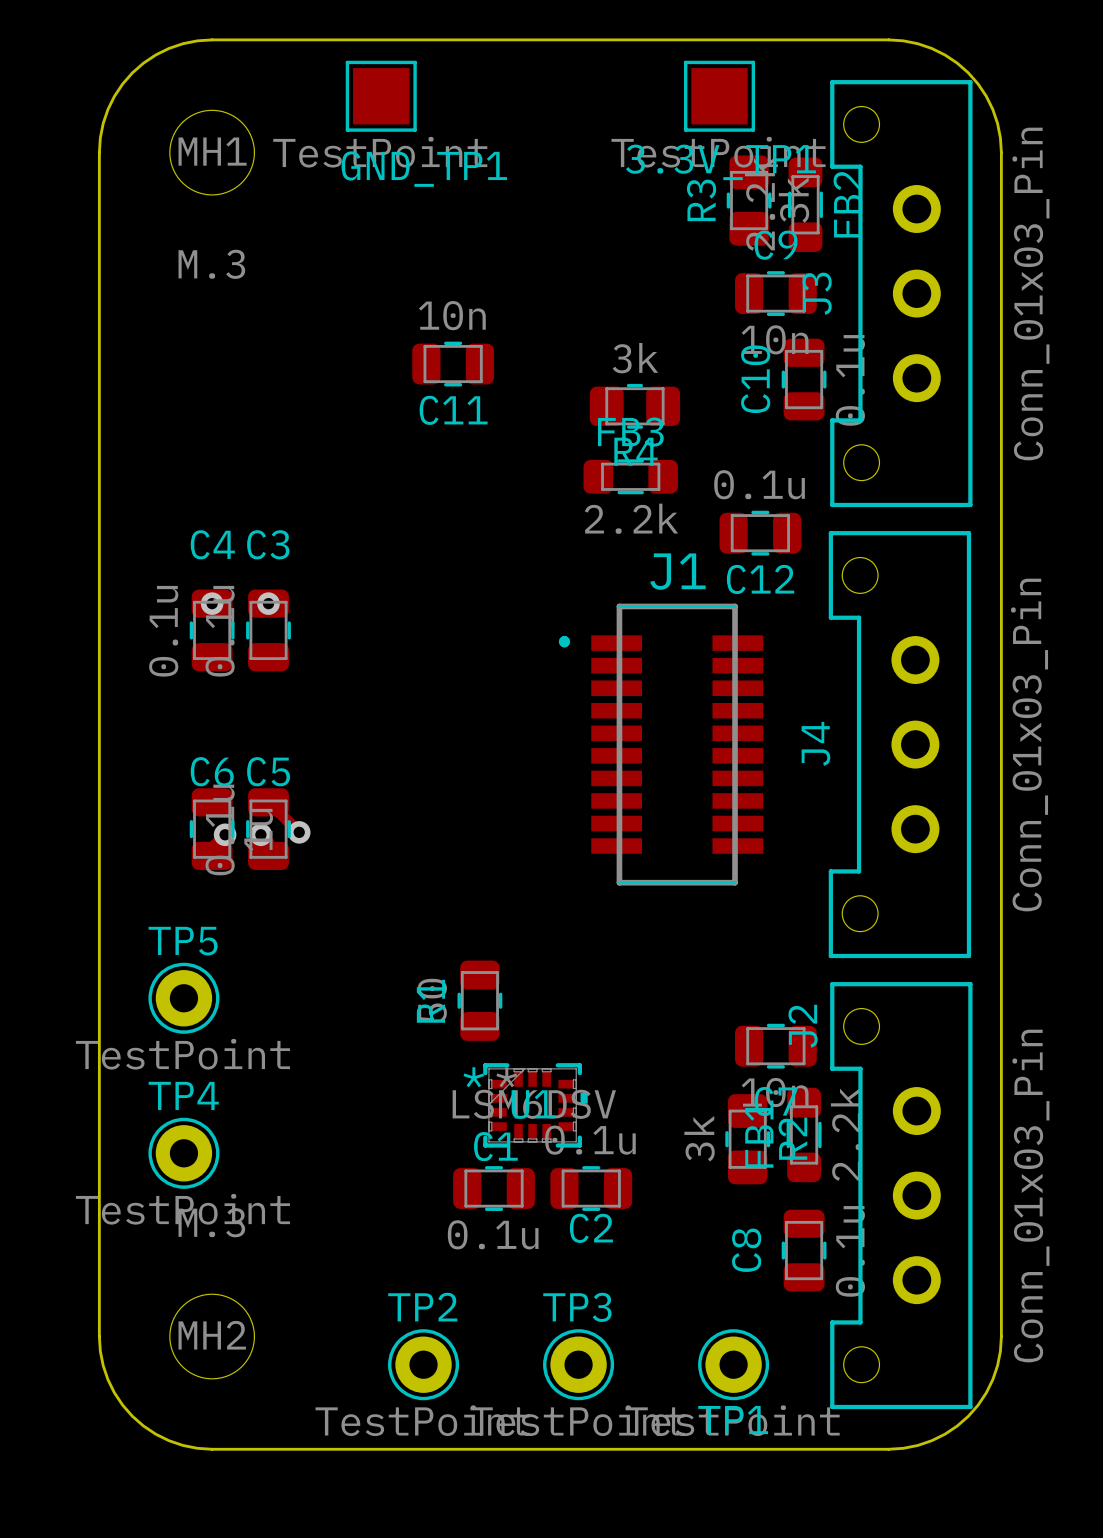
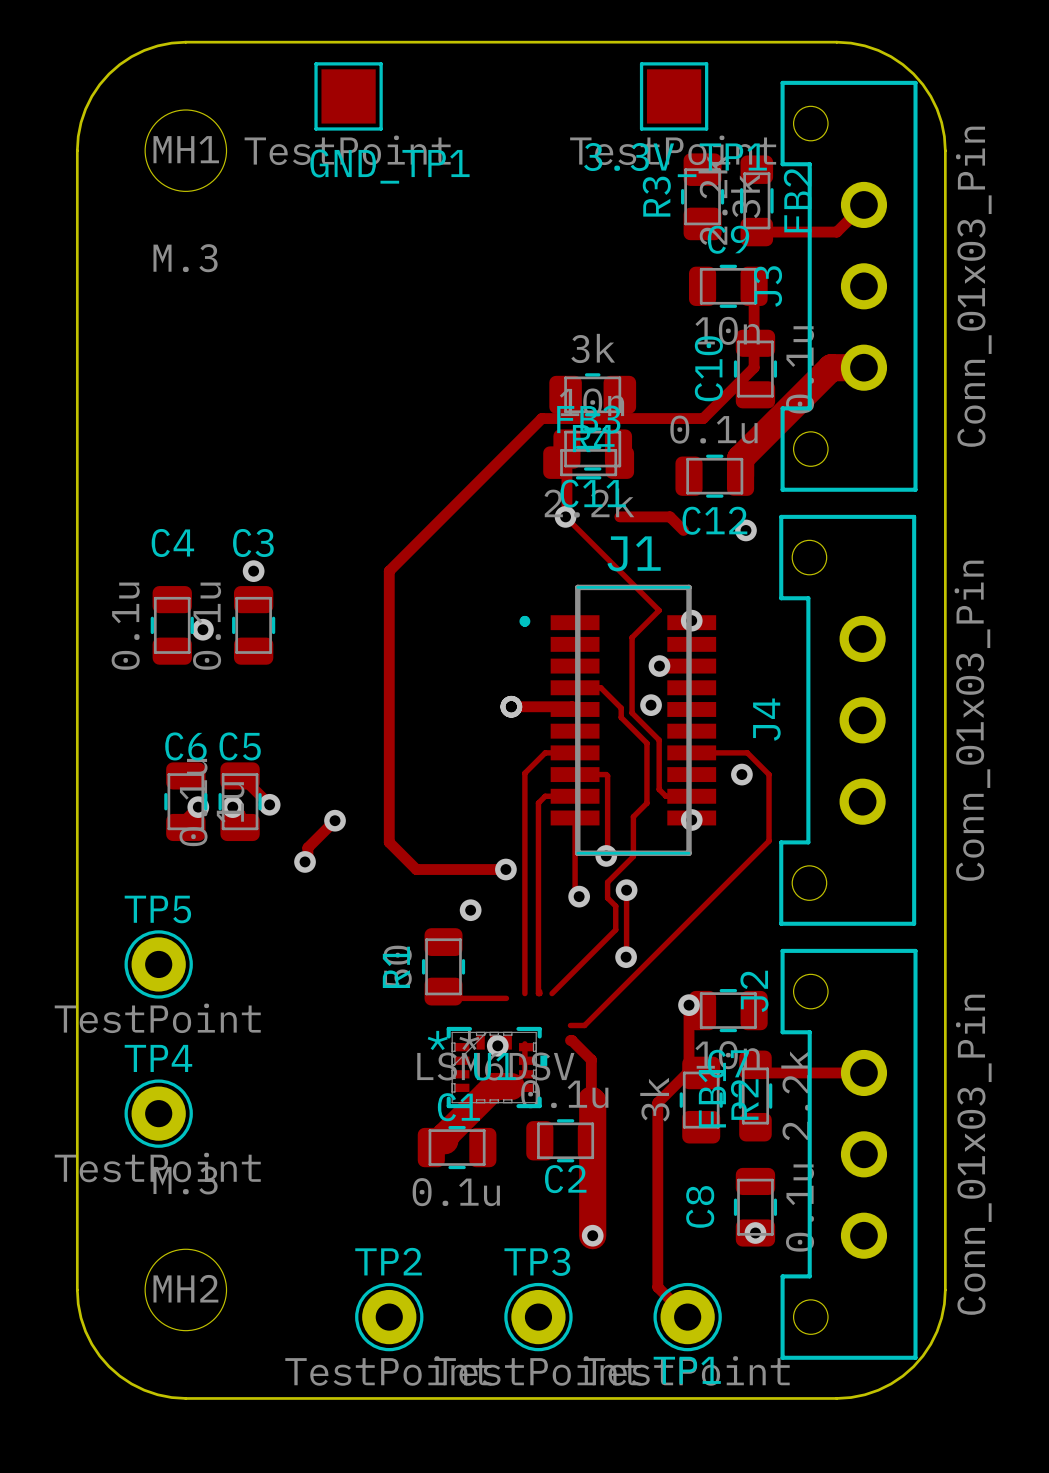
track: none -> (863, 204) (836, 232) (759, 232)
track: none -> (755, 299) (754, 367) (703, 418) (541, 418) (389, 571) (389, 842) (416, 869) (505, 869)
C11 position: (453, 364) -> (592, 449)
track: none -> (863, 367) (831, 367) (740, 458) (740, 476)
track: none -> (566, 449) (565, 516) (659, 610) (632, 637) (632, 713) (659, 740) (659, 789) (665, 796) (691, 796)
via: none -> (565, 516)
track: none -> (619, 516) (670, 516) (683, 530)
C12 position: (760, 533) -> (714, 476)
via: none -> (745, 530)
via: (212, 603) -> none
via position: (268, 603) -> (253, 571)
C4 position: (212, 630) -> (172, 625)
C3 position: (268, 630) -> (253, 625)
via: none -> (691, 620)
via: none -> (202, 629)
via: none -> (659, 666)
track: none -> (575, 687) (600, 687) (621, 708) (621, 717) (646, 743) (646, 803) (633, 816) (633, 856) (607, 882) (607, 898) (615, 906) (615, 929) (552, 993)
via: none -> (651, 705)
track: none -> (511, 706) (572, 706) (575, 709)
via: none -> (511, 706)
track: none -> (575, 752) (545, 752) (524, 773) (524, 993)
track: none -> (691, 752) (747, 752) (769, 774) (769, 841) (584, 1025) (570, 1025)
track: none -> (575, 774) (607, 775) (606, 855)
via: none -> (741, 774)
track: none -> (575, 796) (545, 796) (538, 803) (538, 993) (539, 991)
track: none -> (575, 817) (575, 892) (579, 896)
track: none -> (335, 820) (307, 847) (307, 859) (305, 861)
via: none -> (335, 820)
via: none -> (691, 820)
via: none -> (606, 855)
via: none -> (305, 861)
via: none -> (505, 869)
track: none -> (626, 890) (626, 957)
via: none -> (626, 890)
via: none -> (579, 896)
via: none -> (470, 910)
via: none -> (626, 957)
track: none -> (443, 991) (450, 998) (506, 998)
track: none -> (689, 1005) (689, 1071) (657, 1102) (657, 1287) (687, 1317)
via: none -> (689, 1005)
track: none -> (570, 1040) (591, 1059) (592, 1235)
track: none -> (524, 1043) (524, 1072) (511, 1086) (494, 1086) (444, 1136) (444, 1140)
via: none -> (497, 1045)
track: none -> (755, 1068) (759, 1072) (863, 1072)
C2 position: (591, 1188) -> (565, 1140)
via: none -> (755, 1233)
via: none -> (592, 1235)

